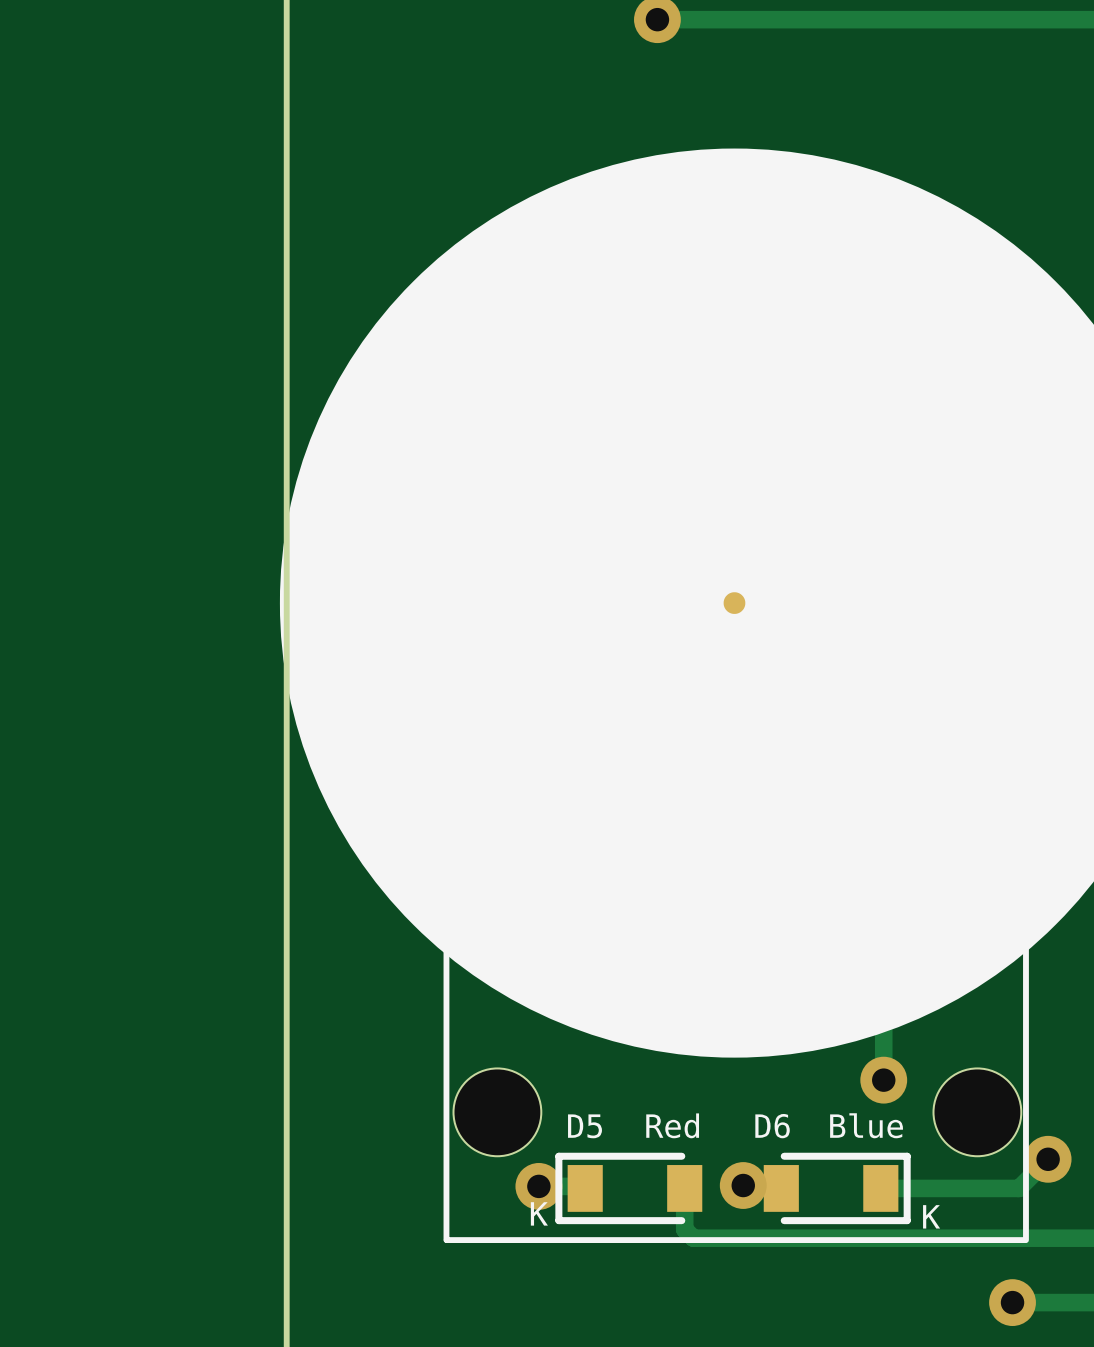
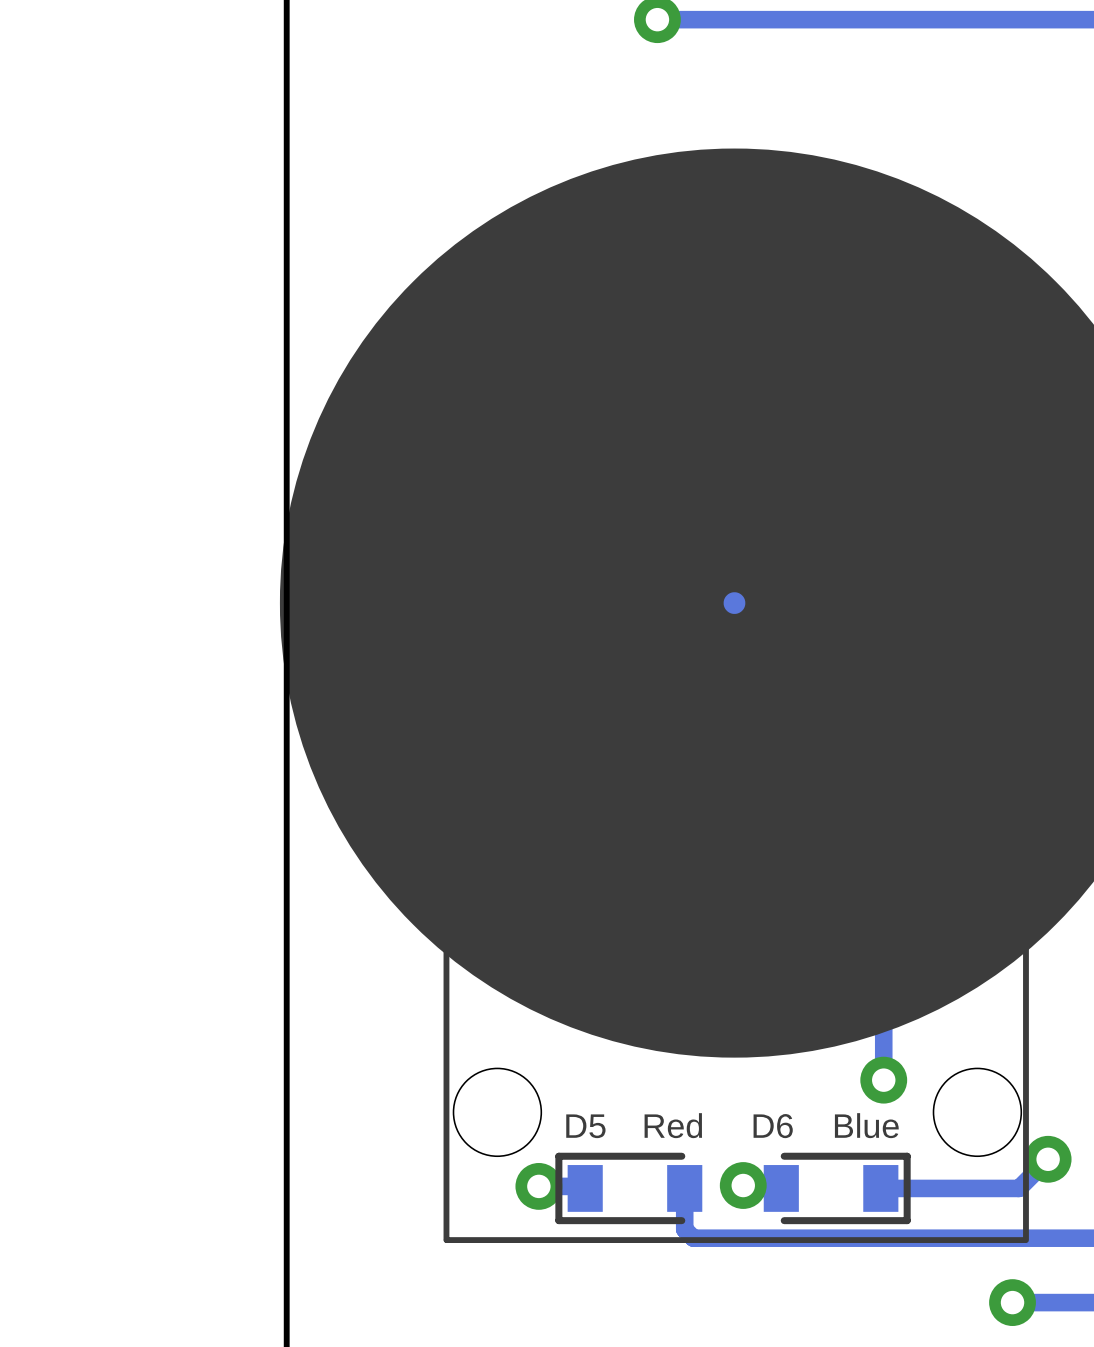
text: K (539, 1213) -> none
text: K (931, 1216) -> none

